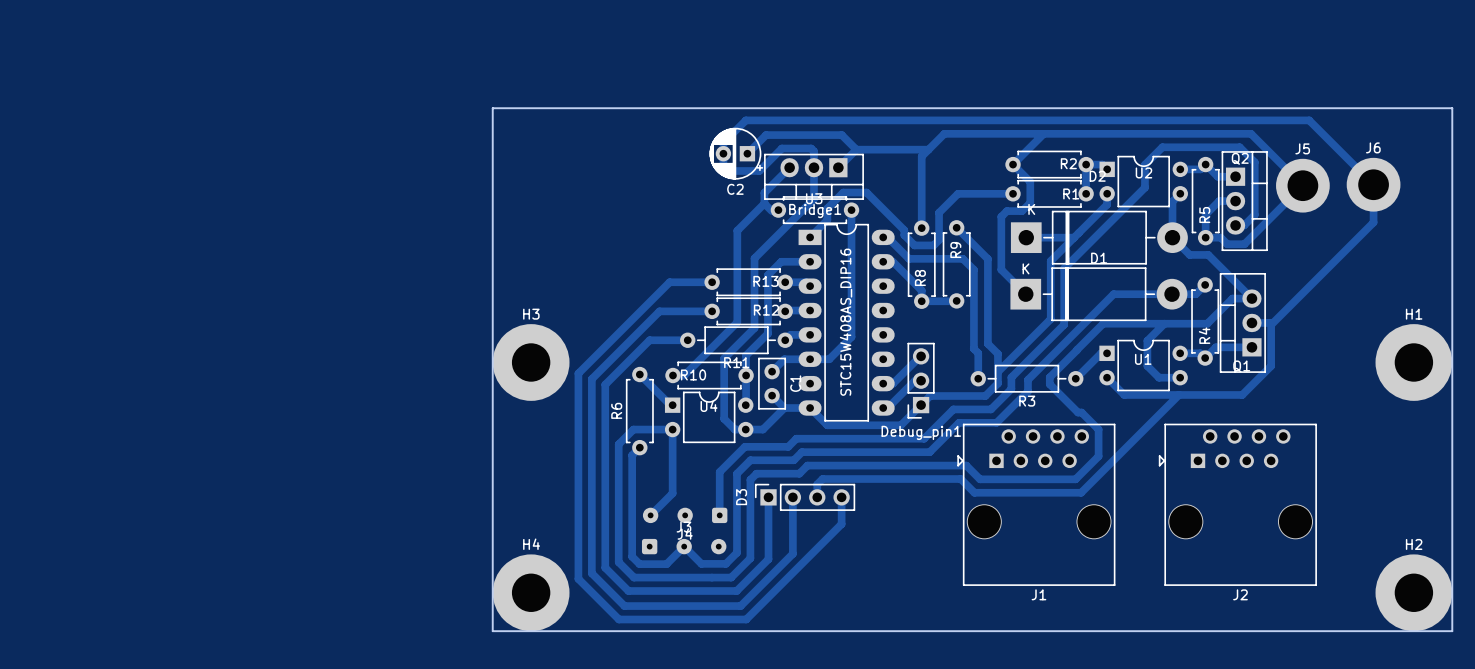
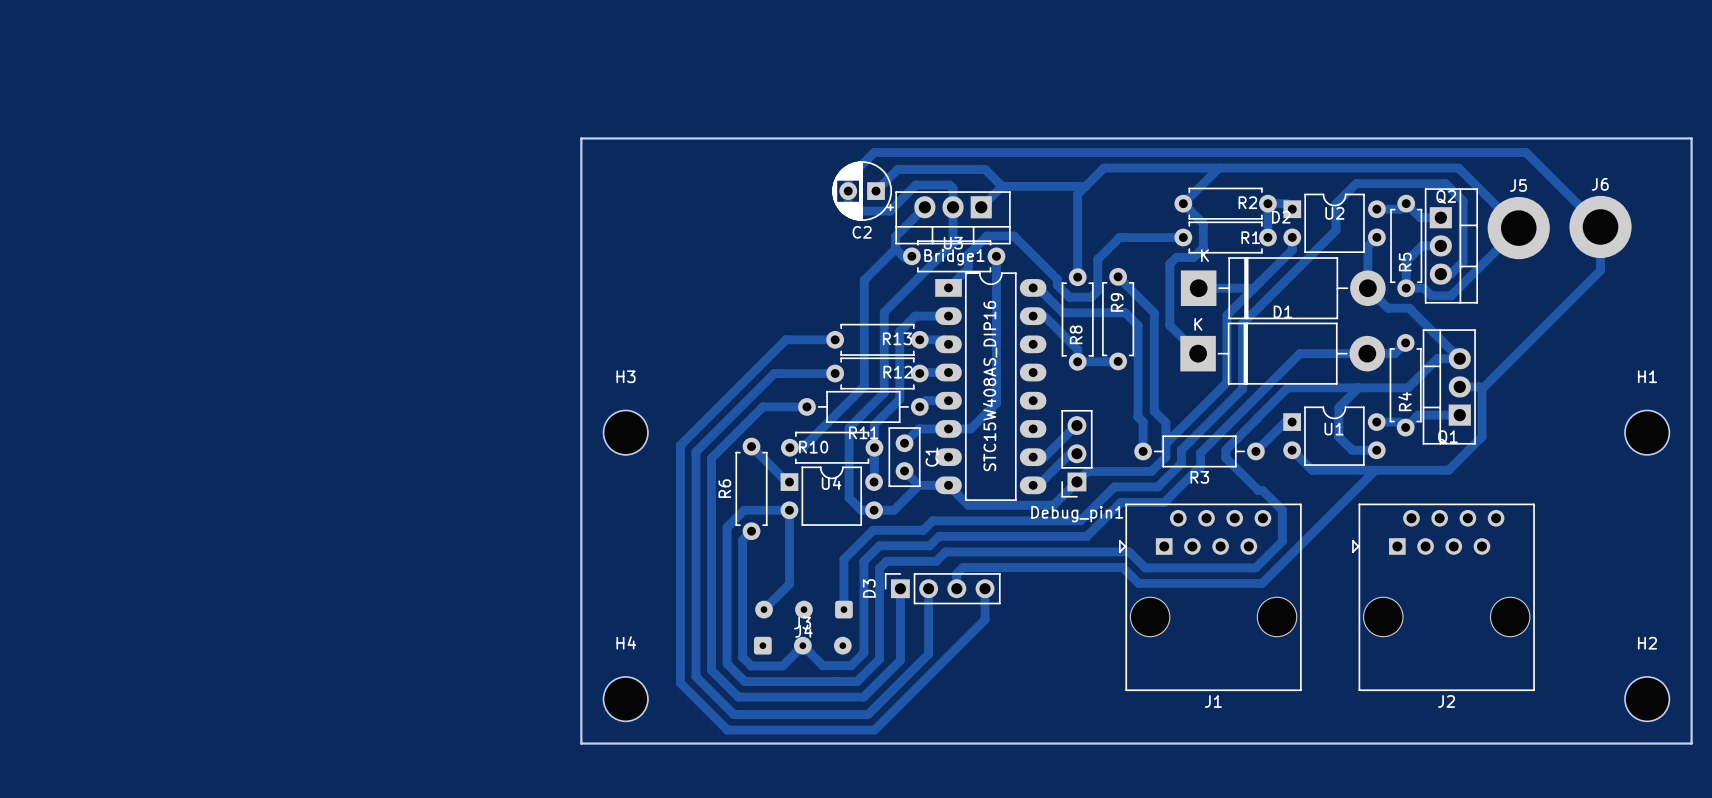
H3 footprint: [492, 324, 570, 401] -> [603, 410, 648, 455]
H1 footprint: [1375, 324, 1453, 401] -> [1624, 410, 1670, 455]
H4 footprint: [492, 554, 570, 632] -> [603, 676, 648, 722]
H2 footprint: [1375, 554, 1453, 632] -> [1624, 676, 1670, 722]

